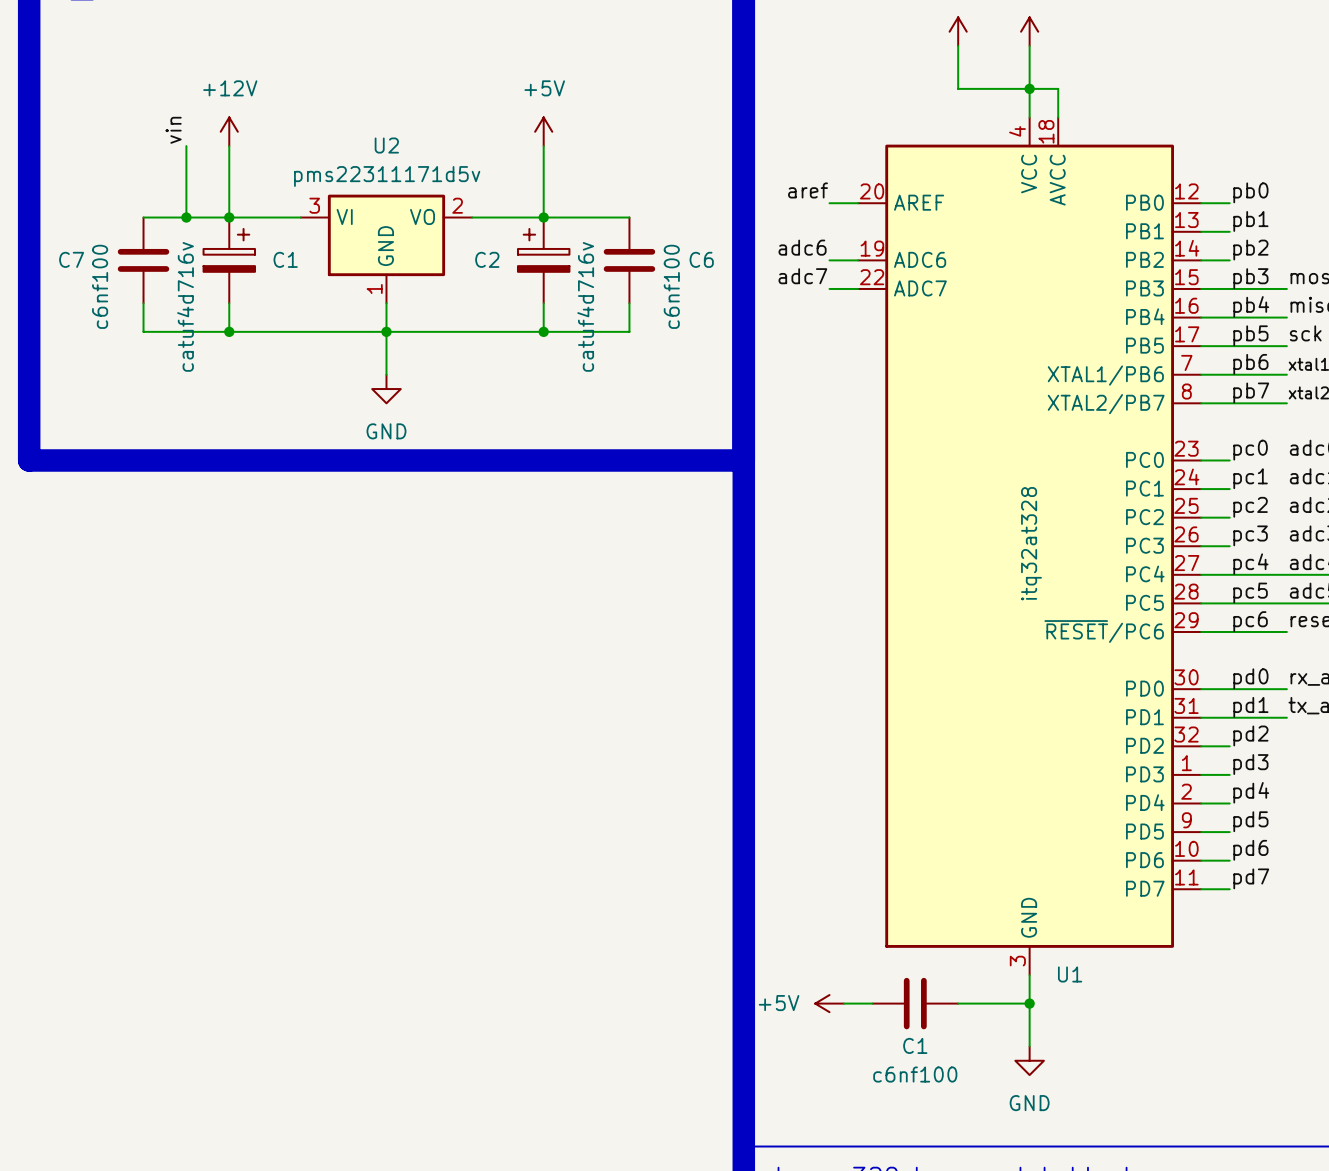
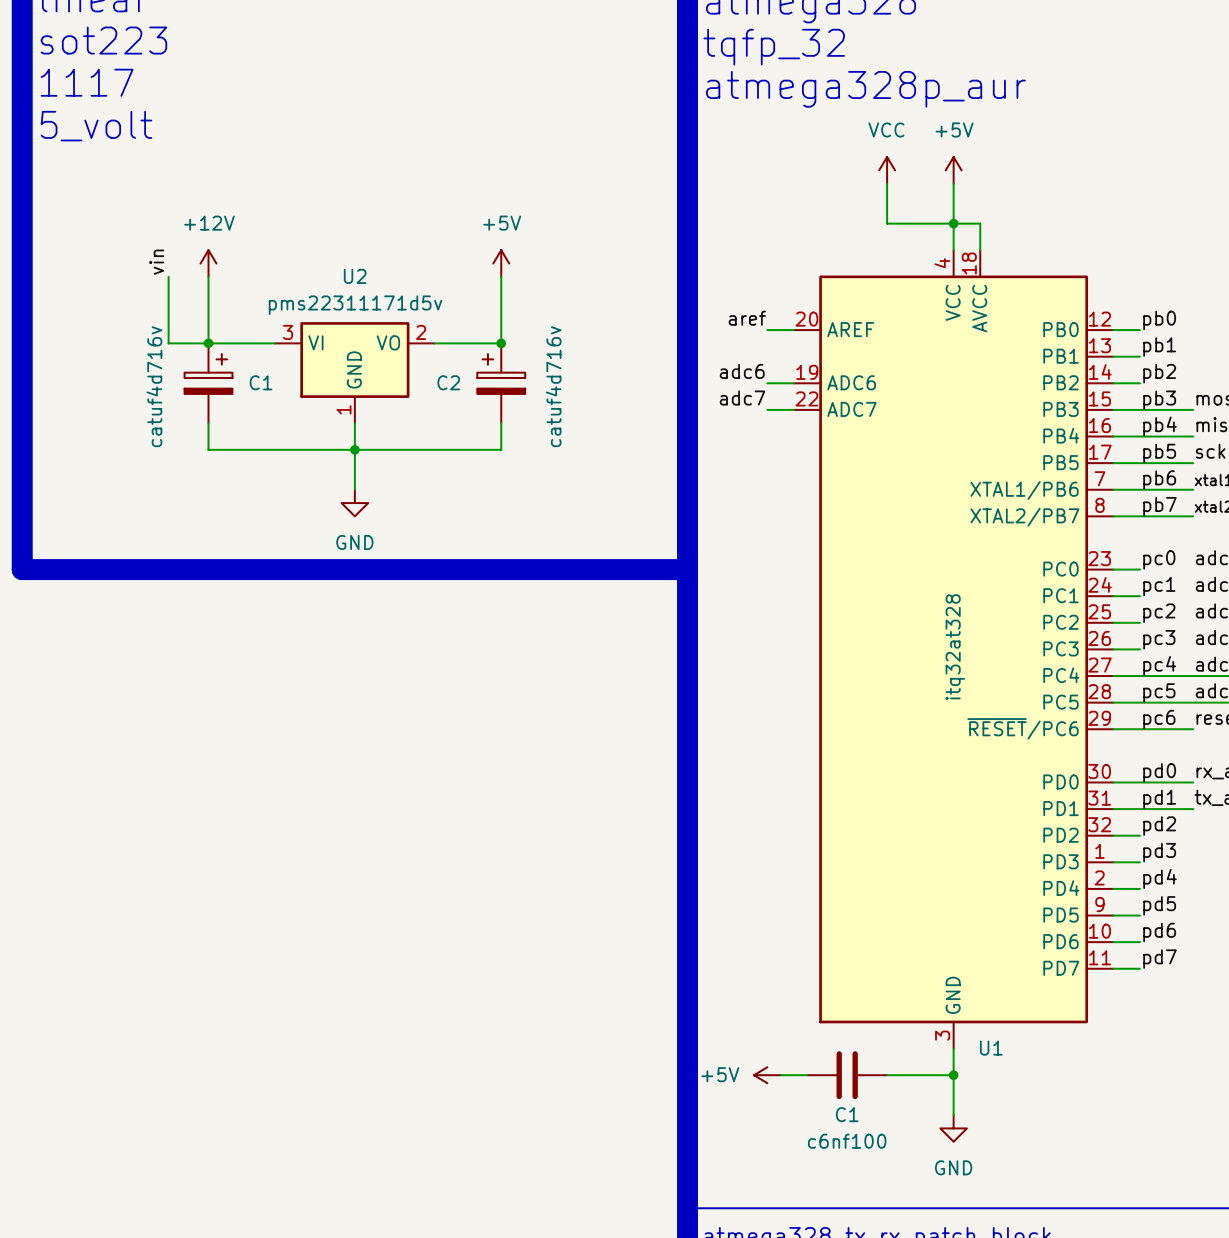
wire: (143, 217) (186, 217) -> none
junction: (186, 217) -> none
wire: (543, 217) (629, 217) -> none
C7: c6nf100 (143, 260) -> none
C6: c6nf100 (629, 260) -> none
wire: (143, 303) (143, 331) (229, 331) -> none
wire: (629, 303) (629, 331) (543, 331) -> none
C1 value position: catuf4d716v (185, 306) -> catuf4d716v (154, 386)
C2 value position: catuf4d716v (585, 306) -> catuf4d716v (553, 386)
junction: (229, 331) -> none
junction: (543, 331) -> none

